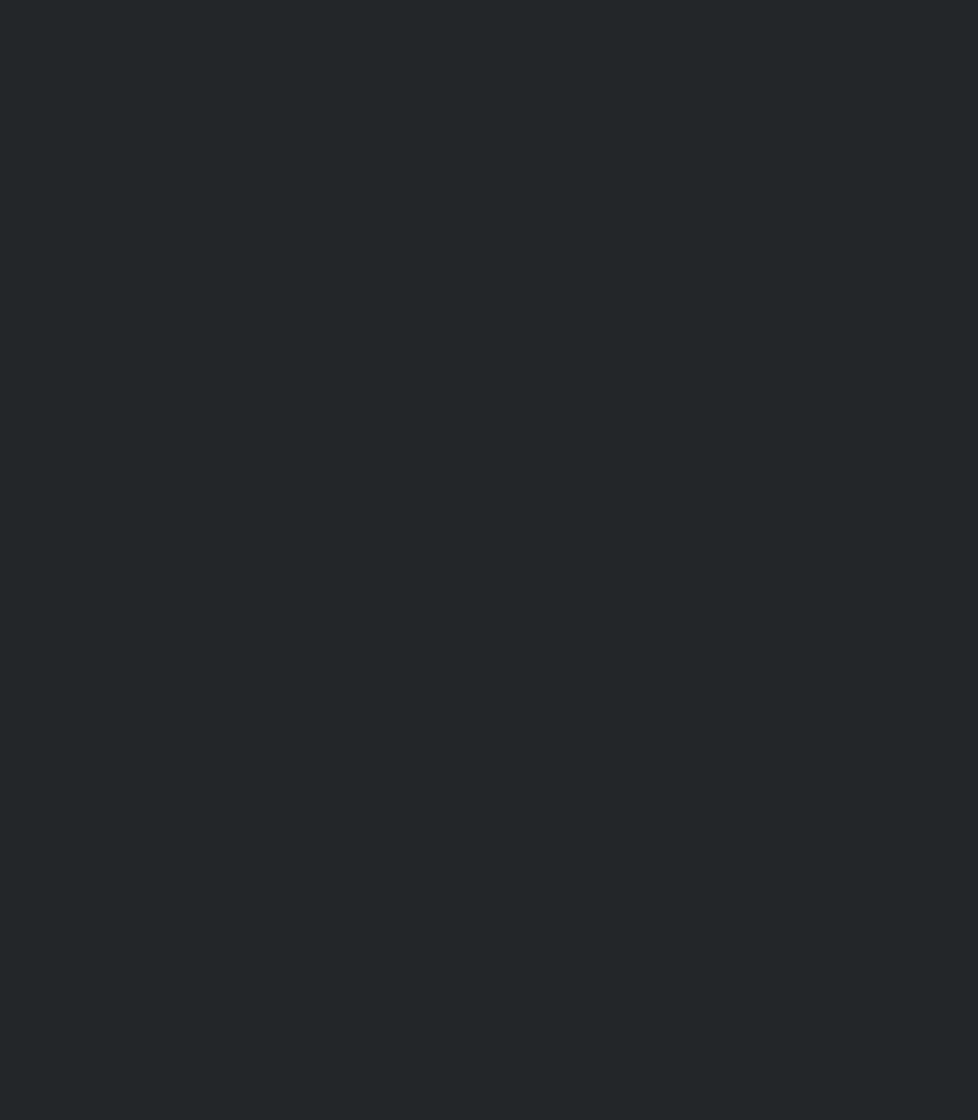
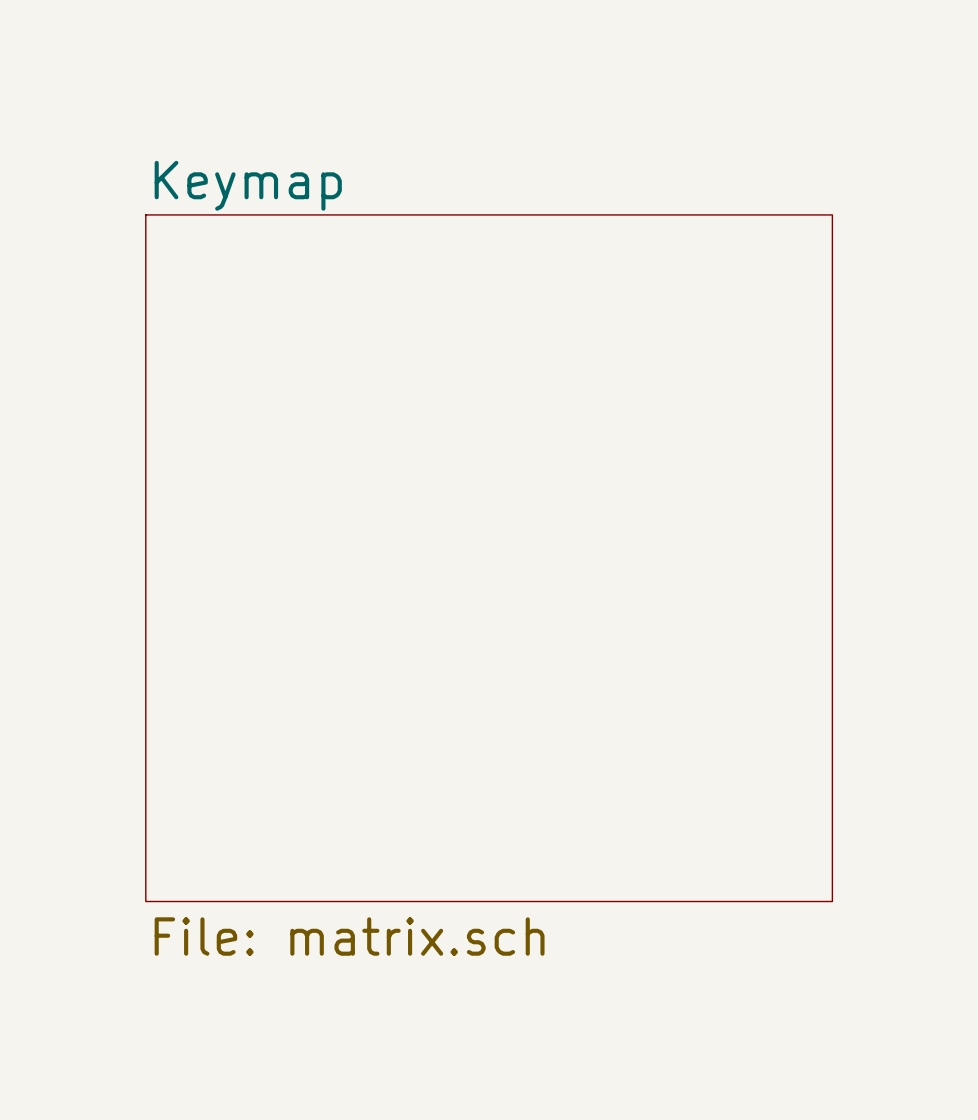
sheet Keymap: none -> File: matrix.sch (489, 558)

